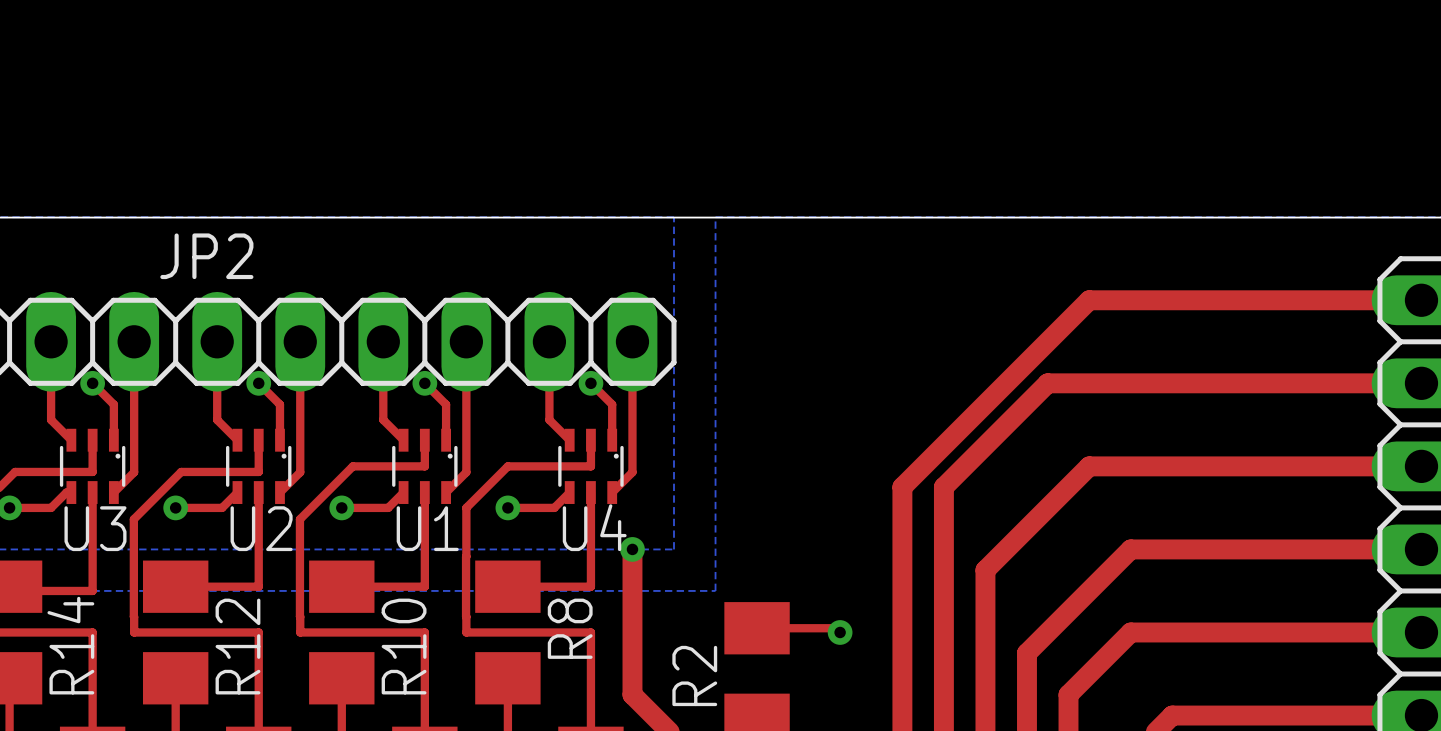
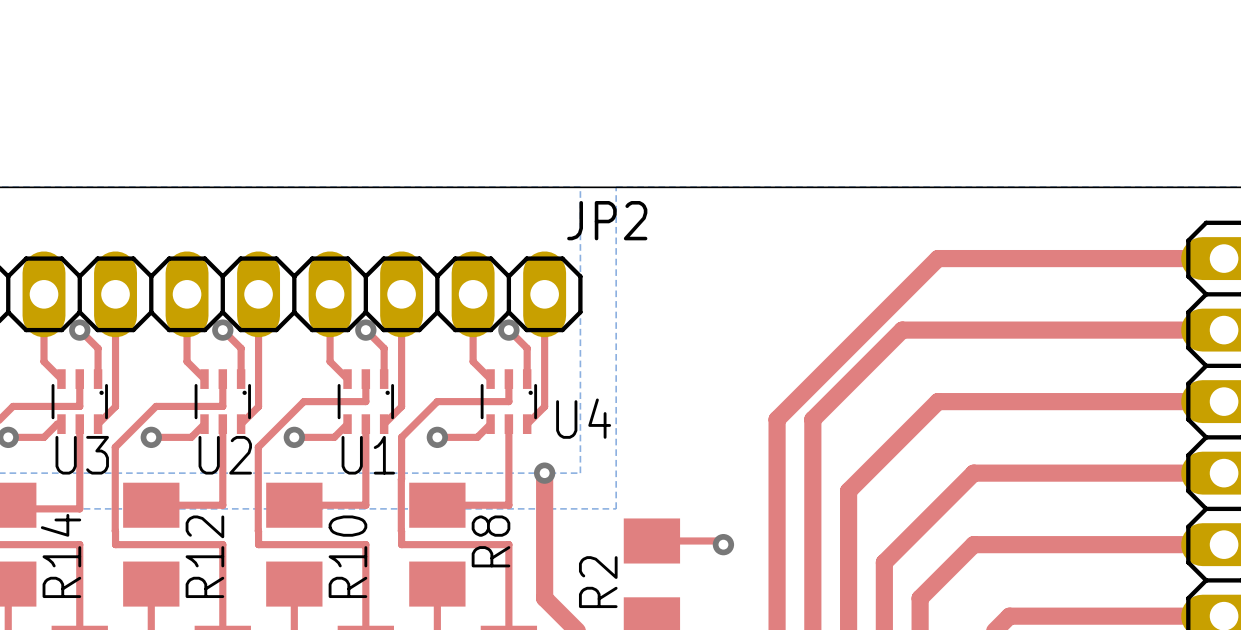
JP2 name position: JP2 (206, 256) -> JP2 (607, 220)
U4 name position: U4 (594, 527) -> U4 (583, 418)

